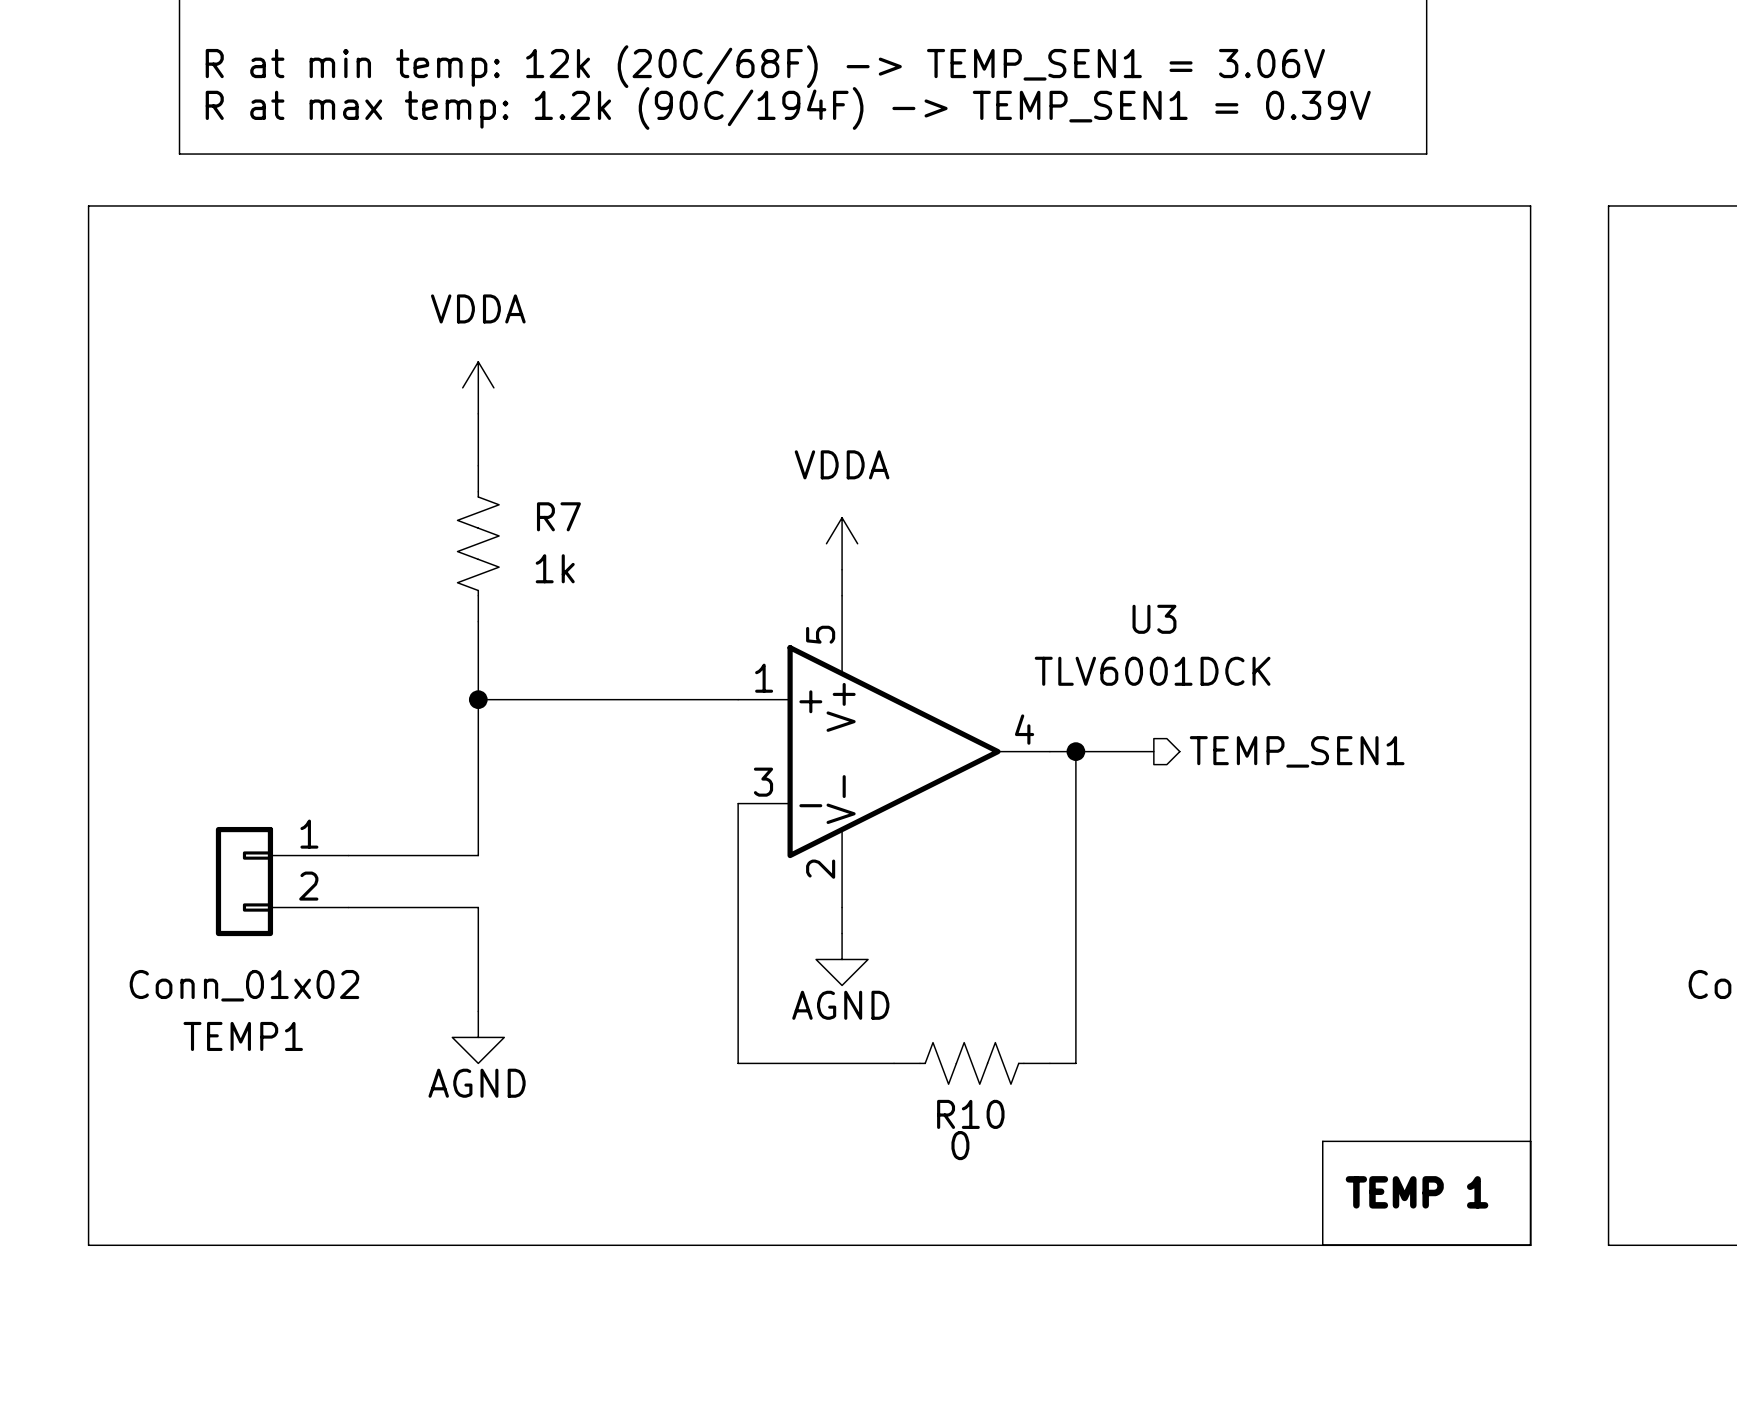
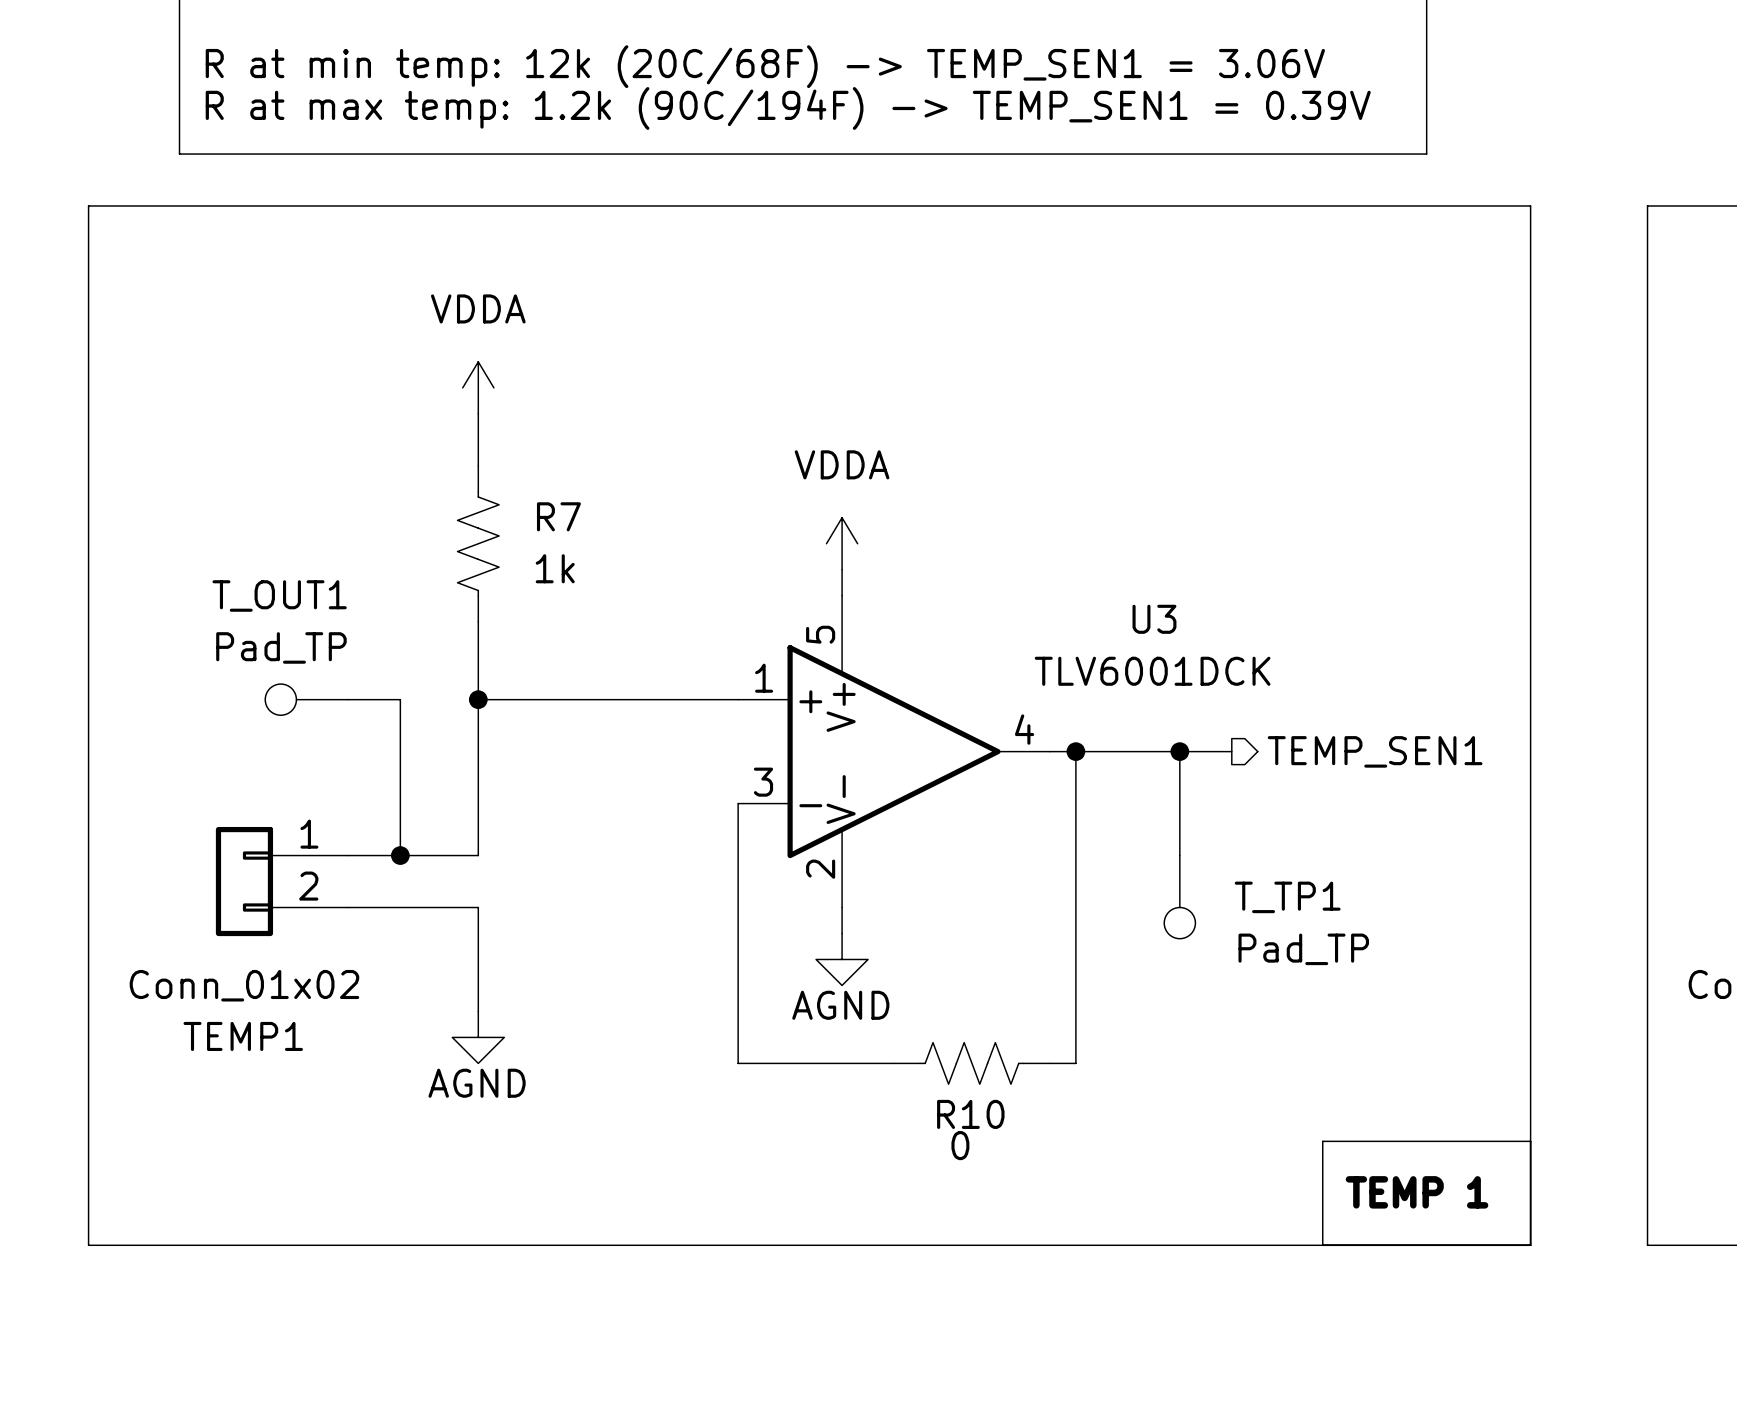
line: (1647, 205) (1608, 205) (1608, 1245) (1647, 1245) -> (1647, 205) (1647, 1245)
T_OUT1: none -> Pad_TP (306, 699)
wire: none -> (348, 699) (400, 699) (400, 855)
wire: none -> (1153, 751) (1231, 751)
wire: none -> (1179, 751) (1179, 855)
junction: none -> (1179, 751)
hierarchical label position: TEMP_SEN1 (1297, 751) -> TEMP_SEN1 (1375, 751)
junction: none -> (400, 855)
T_TP1: none -> Pad_TP (1179, 897)

